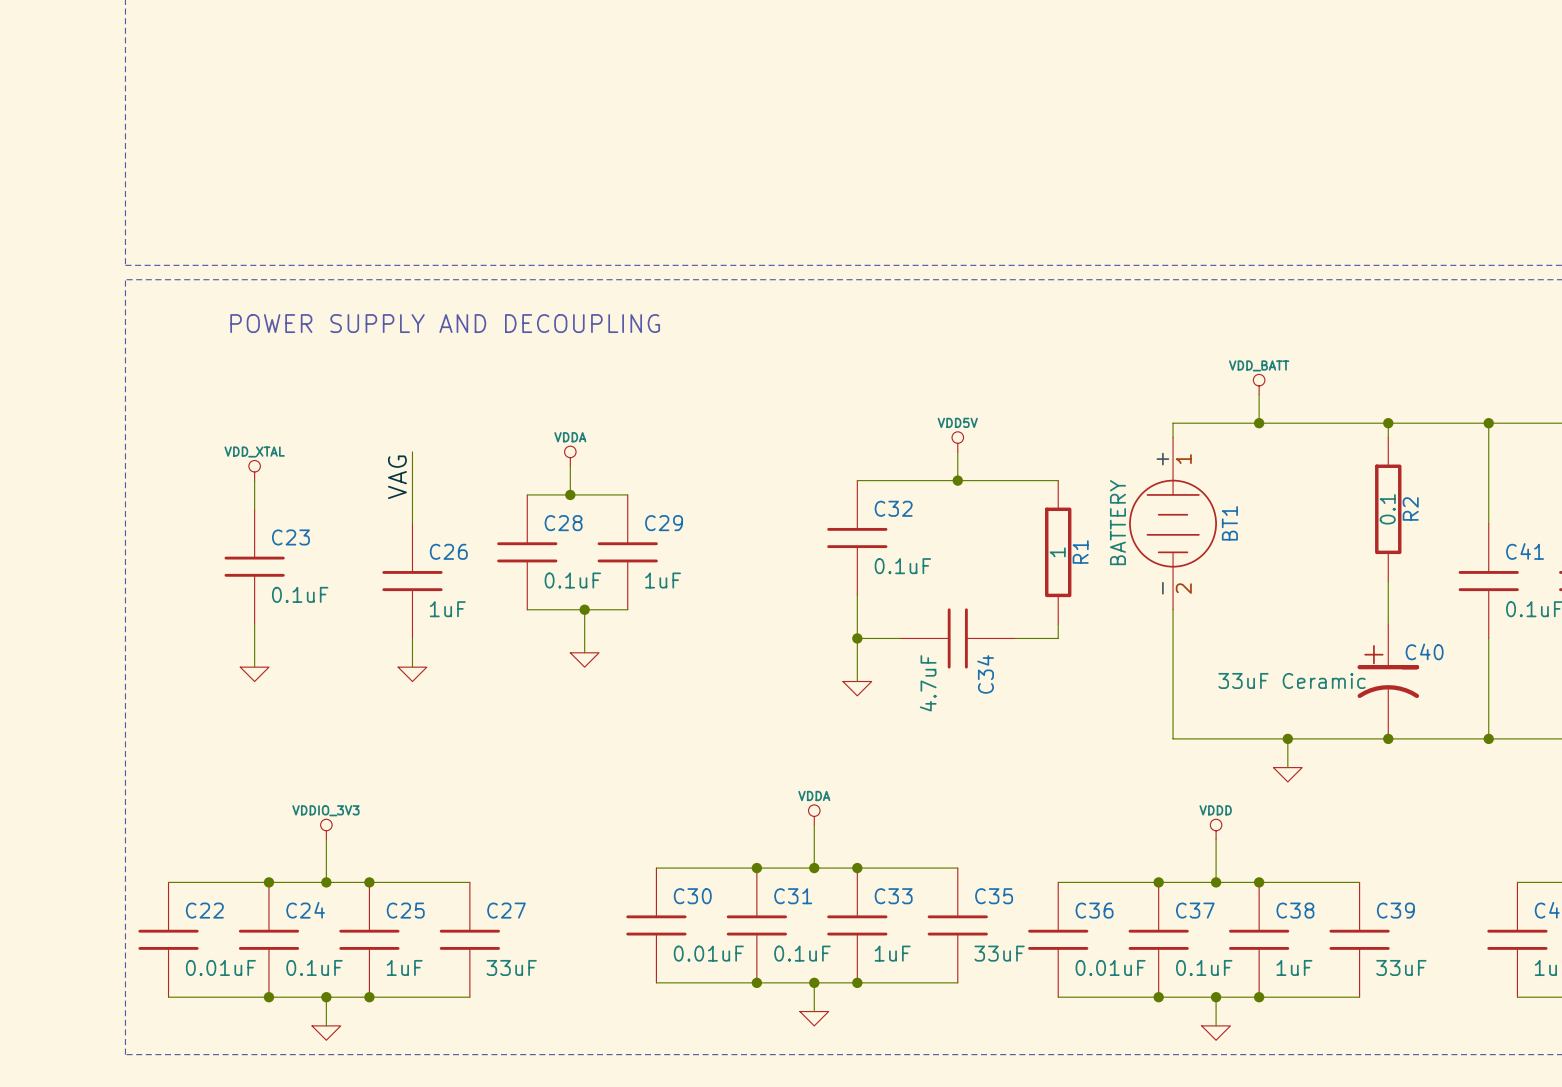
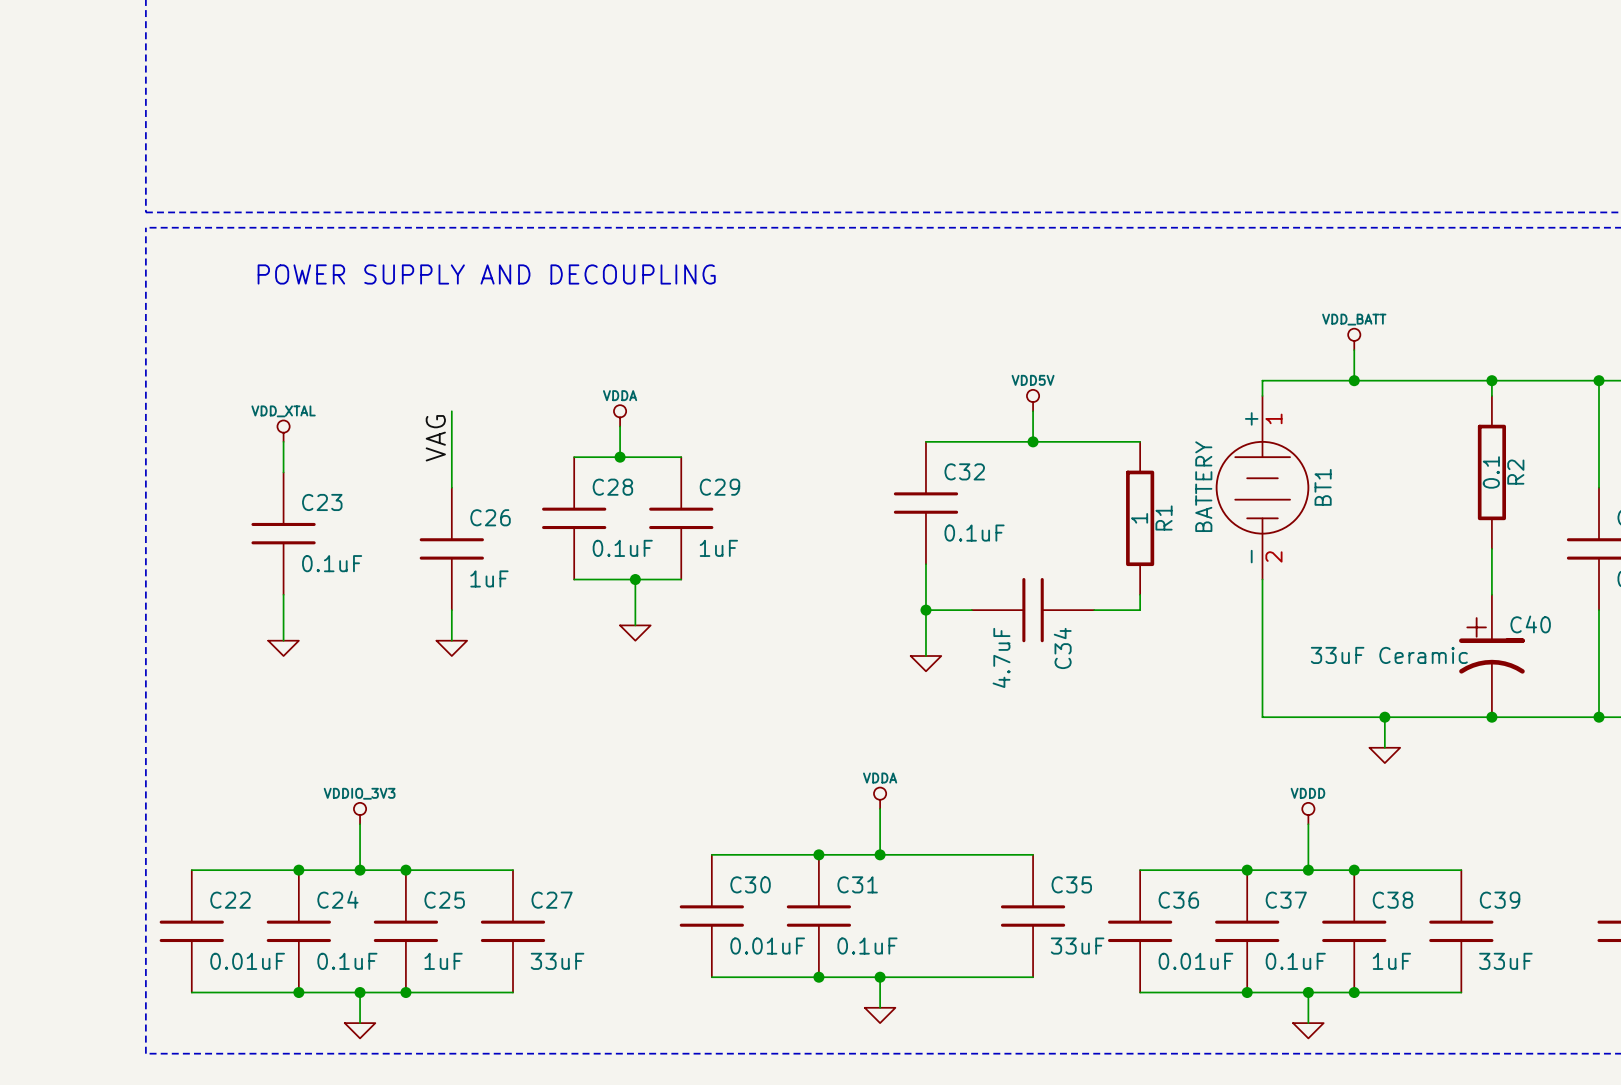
junction: (857, 868) -> none
C33: 1uF (857, 925) -> none
junction: (857, 982) -> none

